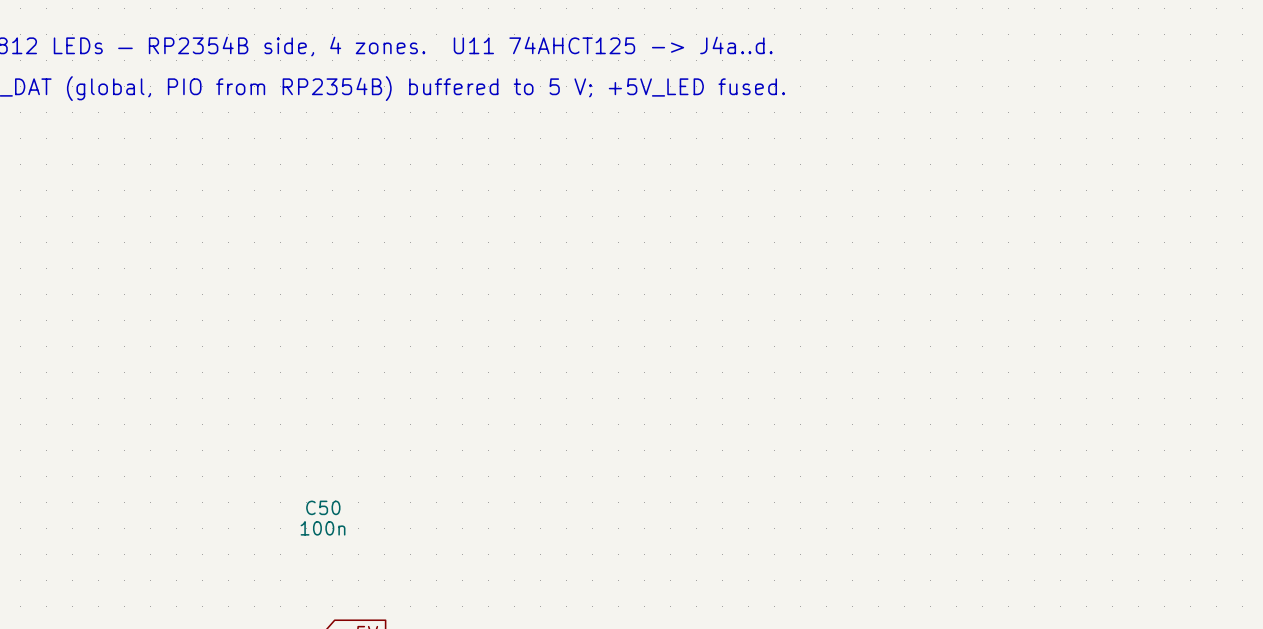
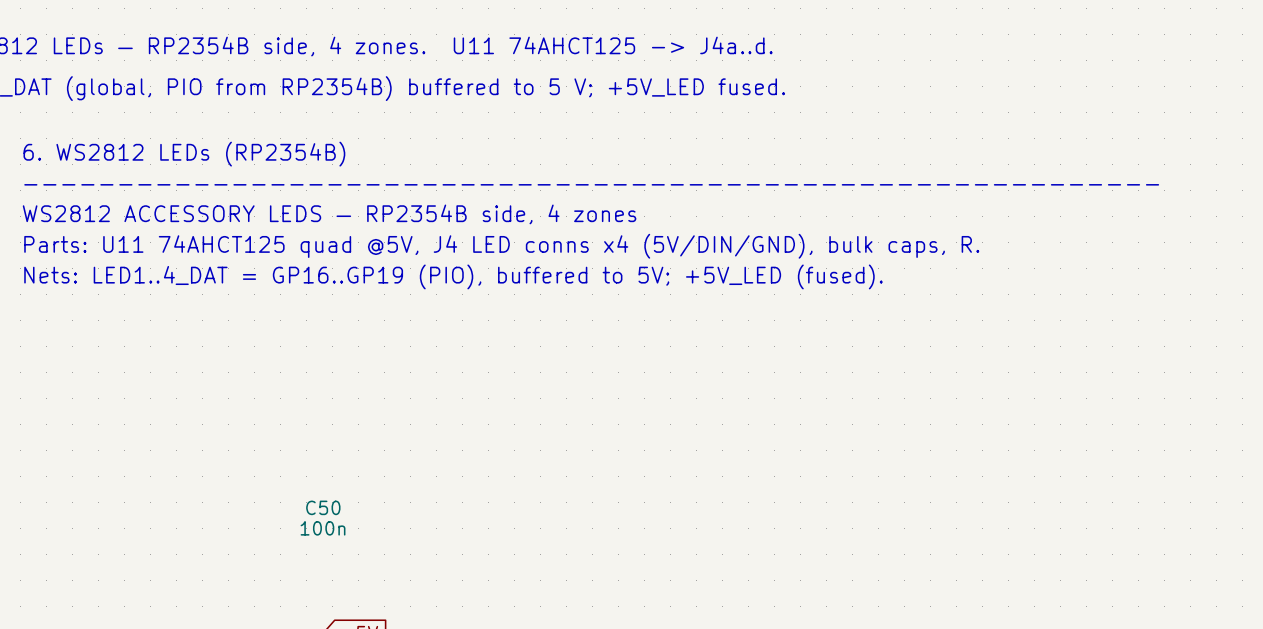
text: none -> 6. WS2812 LEDs (RP2354B) (184, 154)
text: none -> ------------------------------------------------------------ (591, 184)
text: none -> WS2812 ACCESSORY LEDS — RP2354B side, 4 zones (329, 214)
text: none -> Parts: U11 74AHCT125 quad @5V, J4 LED conns x4 (5V/DIN/GND), bulk caps, R. (501, 246)
text: none -> Nets: LED1..4_DAT = GP16..GP19 (PIO), buffered to 5V; +5V_LED (fused). (453, 276)

